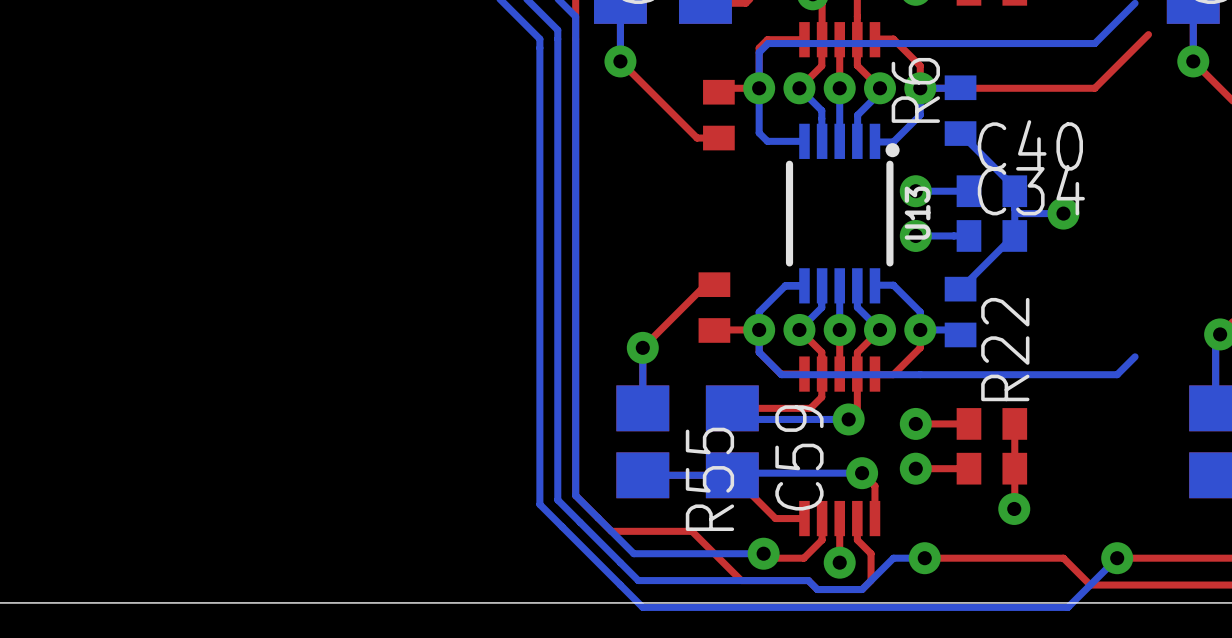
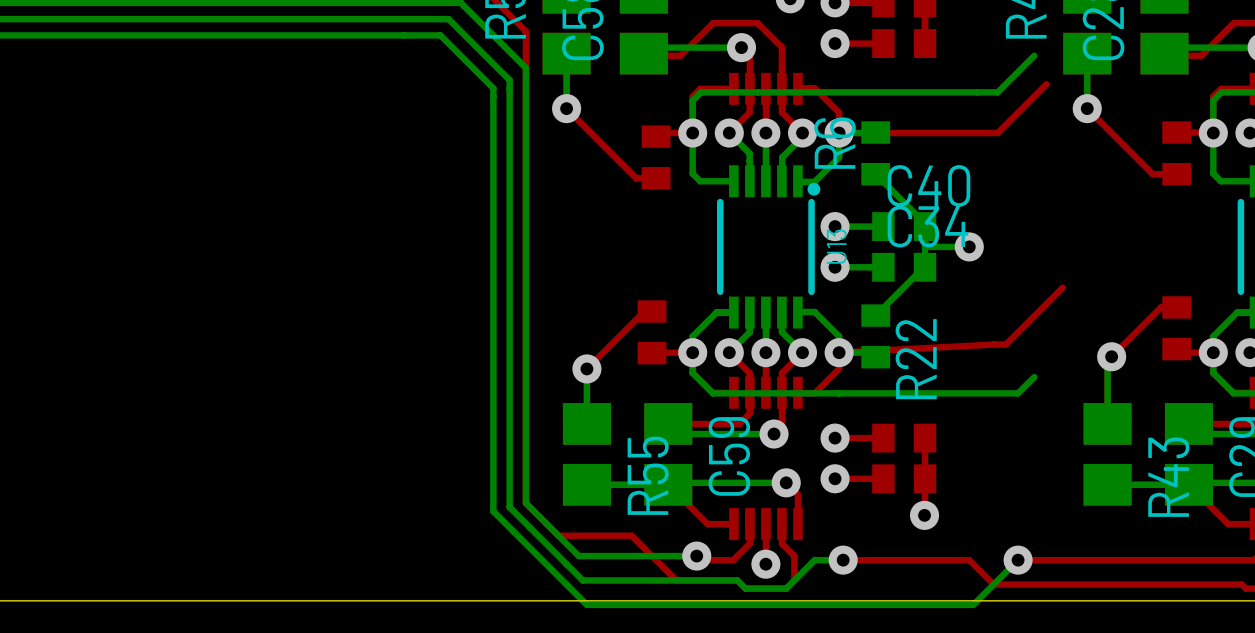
top track: none -> (1062, 287) (1005, 344) (839, 352)

